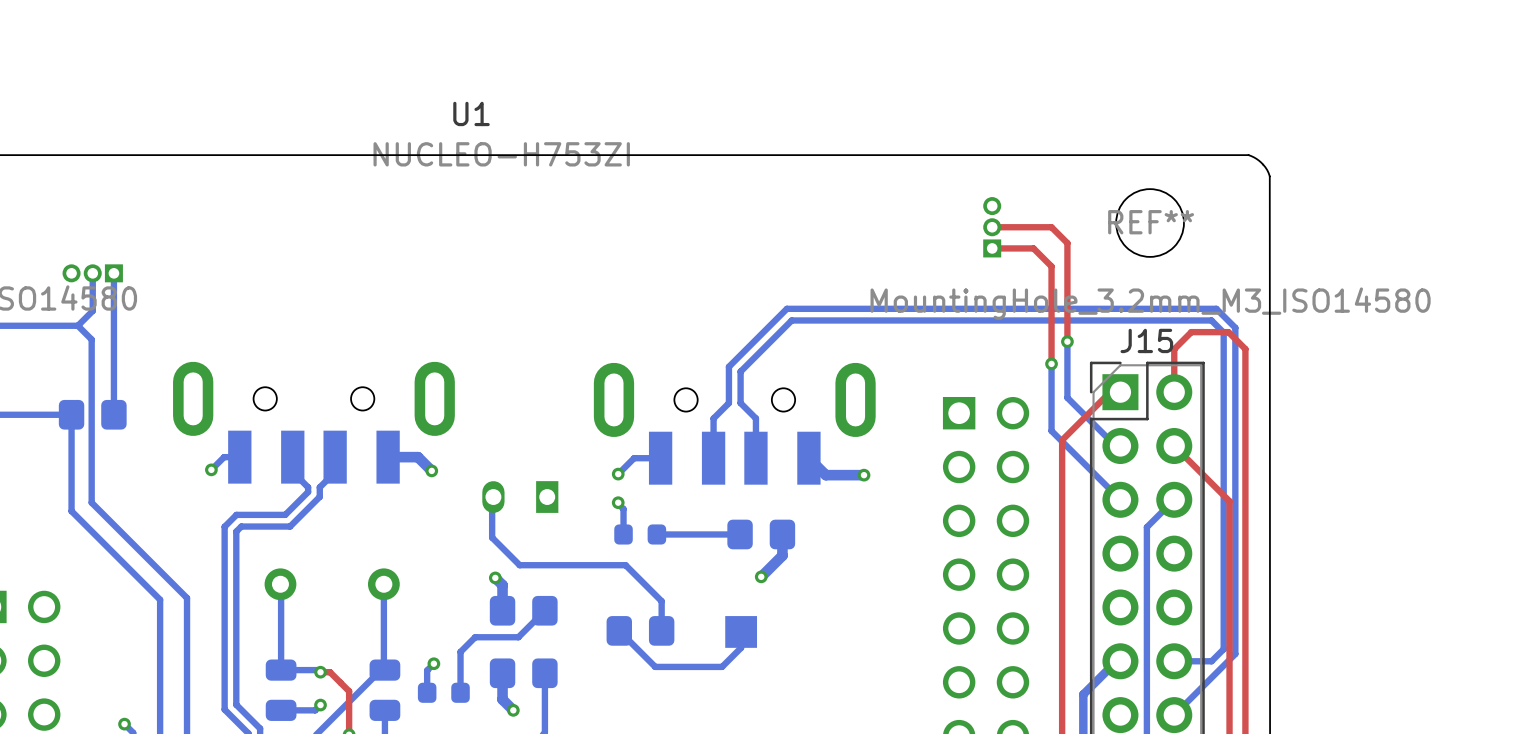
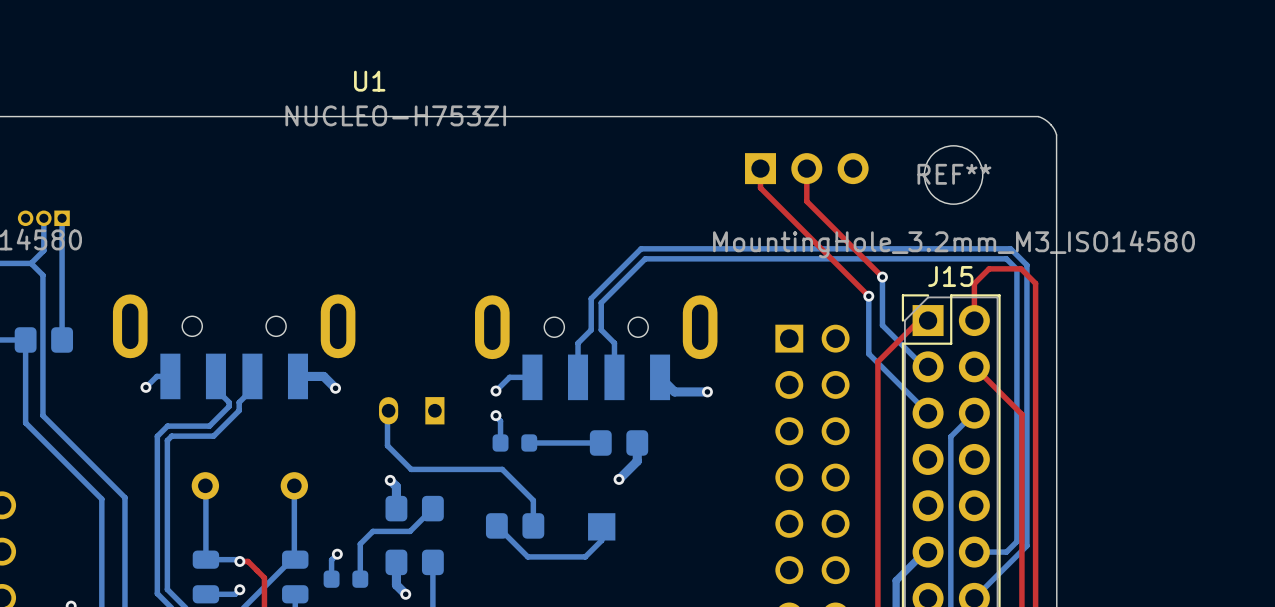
part footprint: [983, 197, 1002, 258] -> [745, 153, 869, 185]
top track: (992, 227) (1051, 227) (1067, 243) (1067, 341) -> (806, 168) (806, 201) (882, 277)
top track: (992, 248) (1033, 248) (1051, 266) (1051, 363) -> (760, 168) (760, 187) (868, 296)

